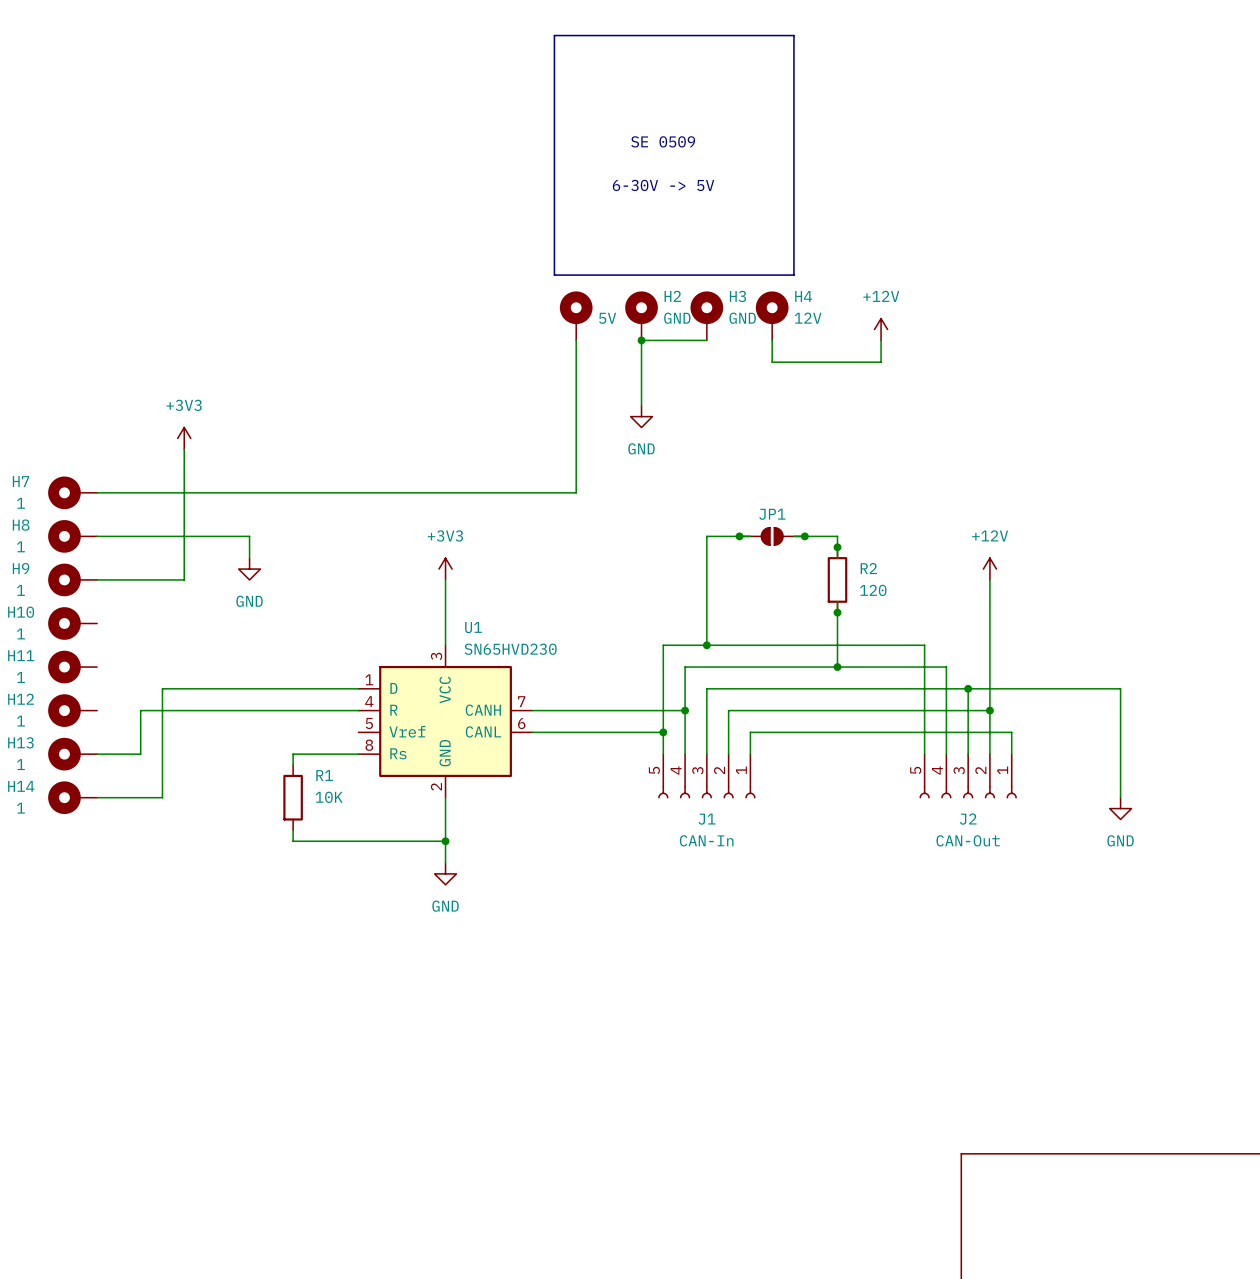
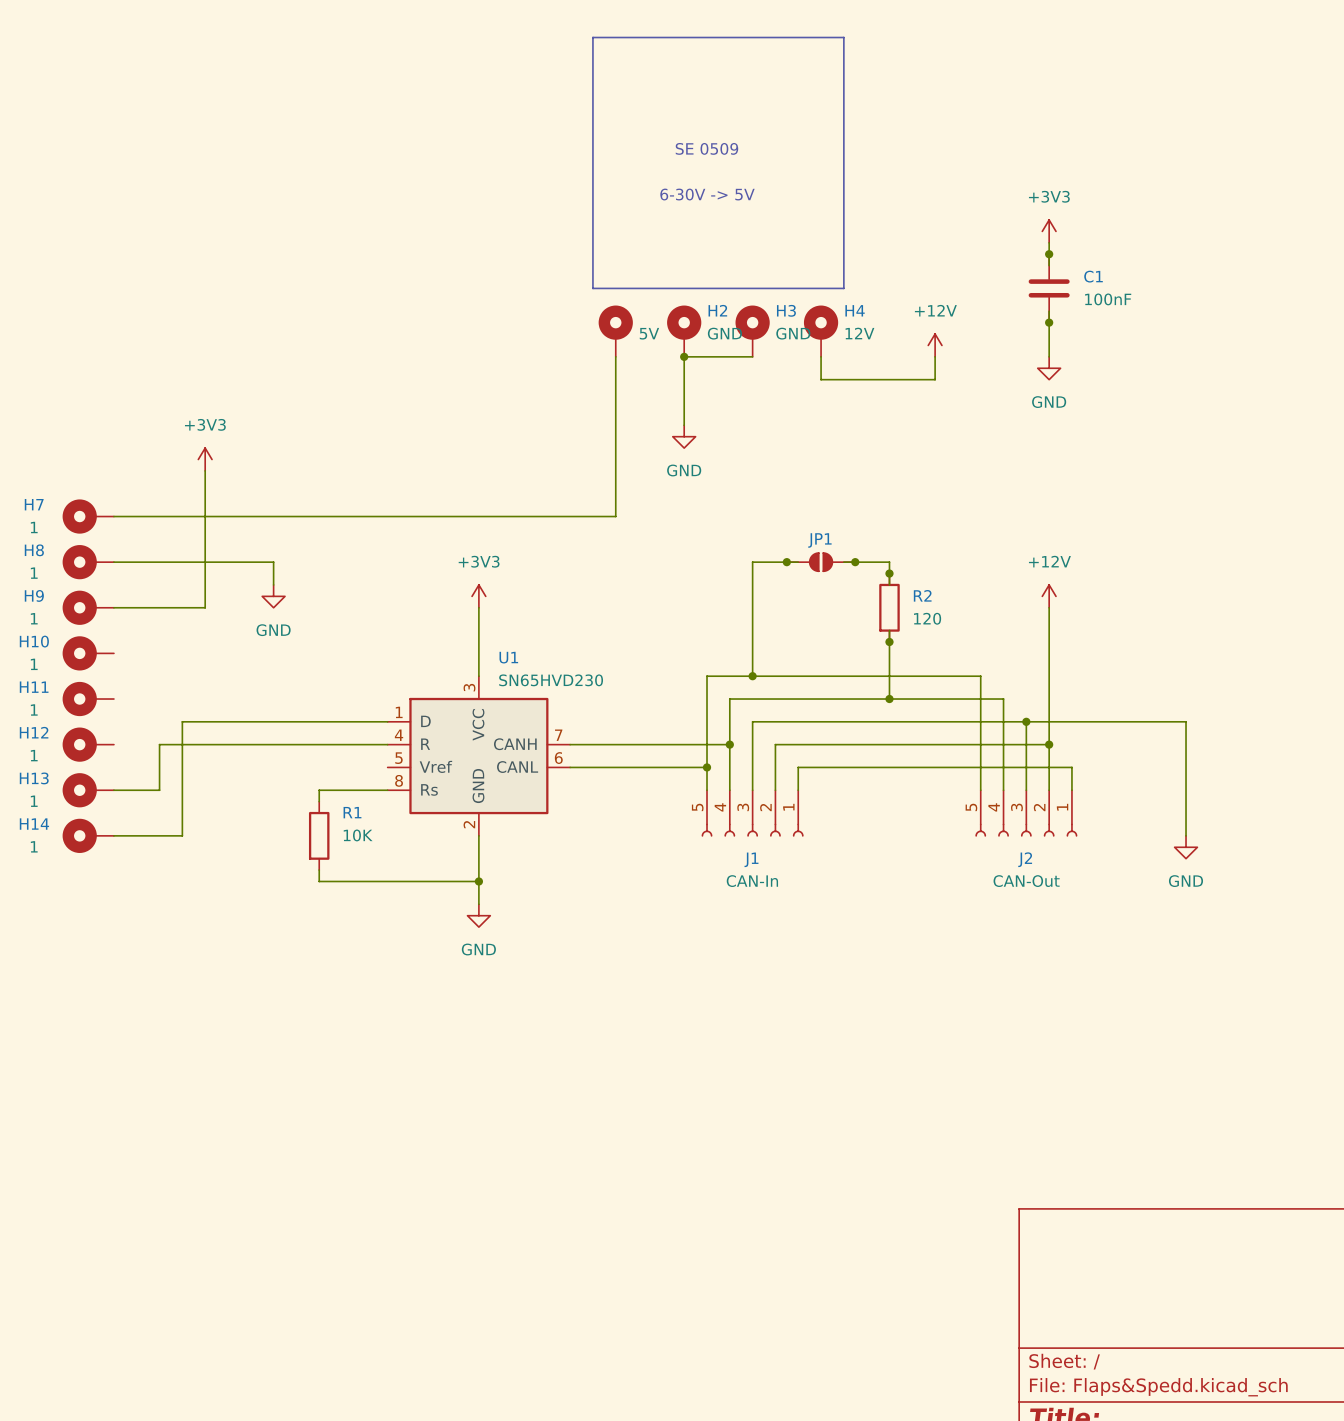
power symbol: none -> +3V3 (1049, 231)
wire: none -> (1049, 242) (1049, 265)
junction: none -> (1049, 254)
C1: none -> 100nF (1049, 288)
wire: none -> (1049, 311) (1049, 356)
junction: none -> (1049, 322)
power symbol: none -> GND (1049, 368)

